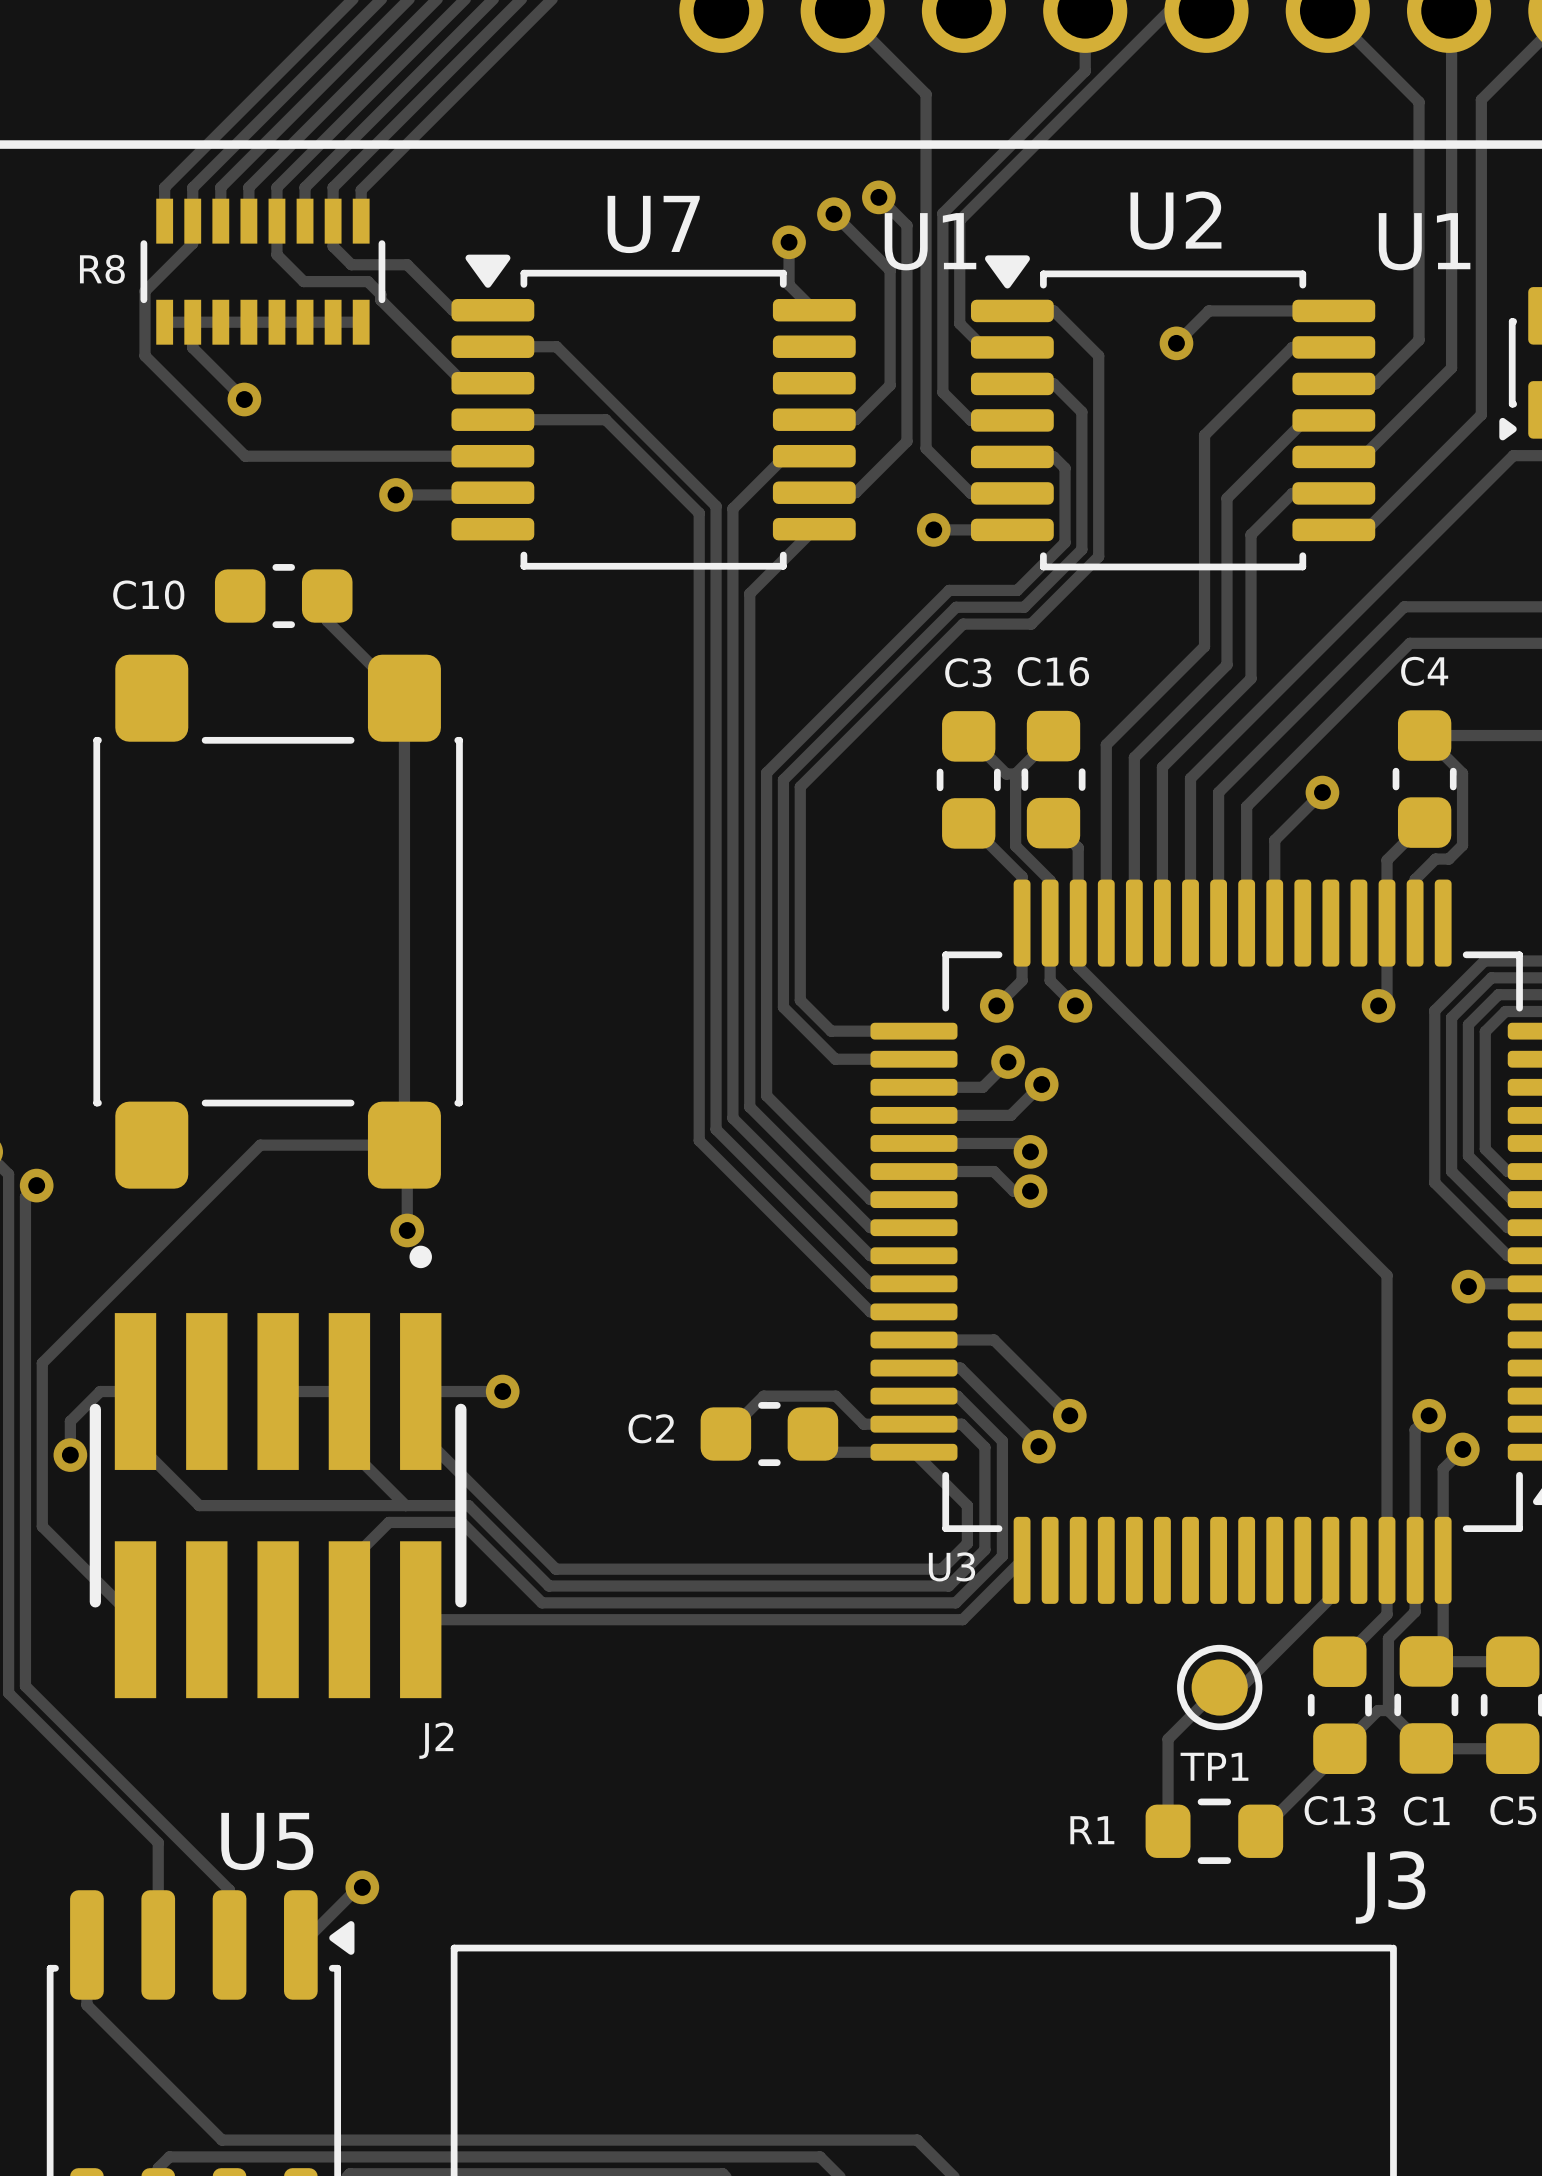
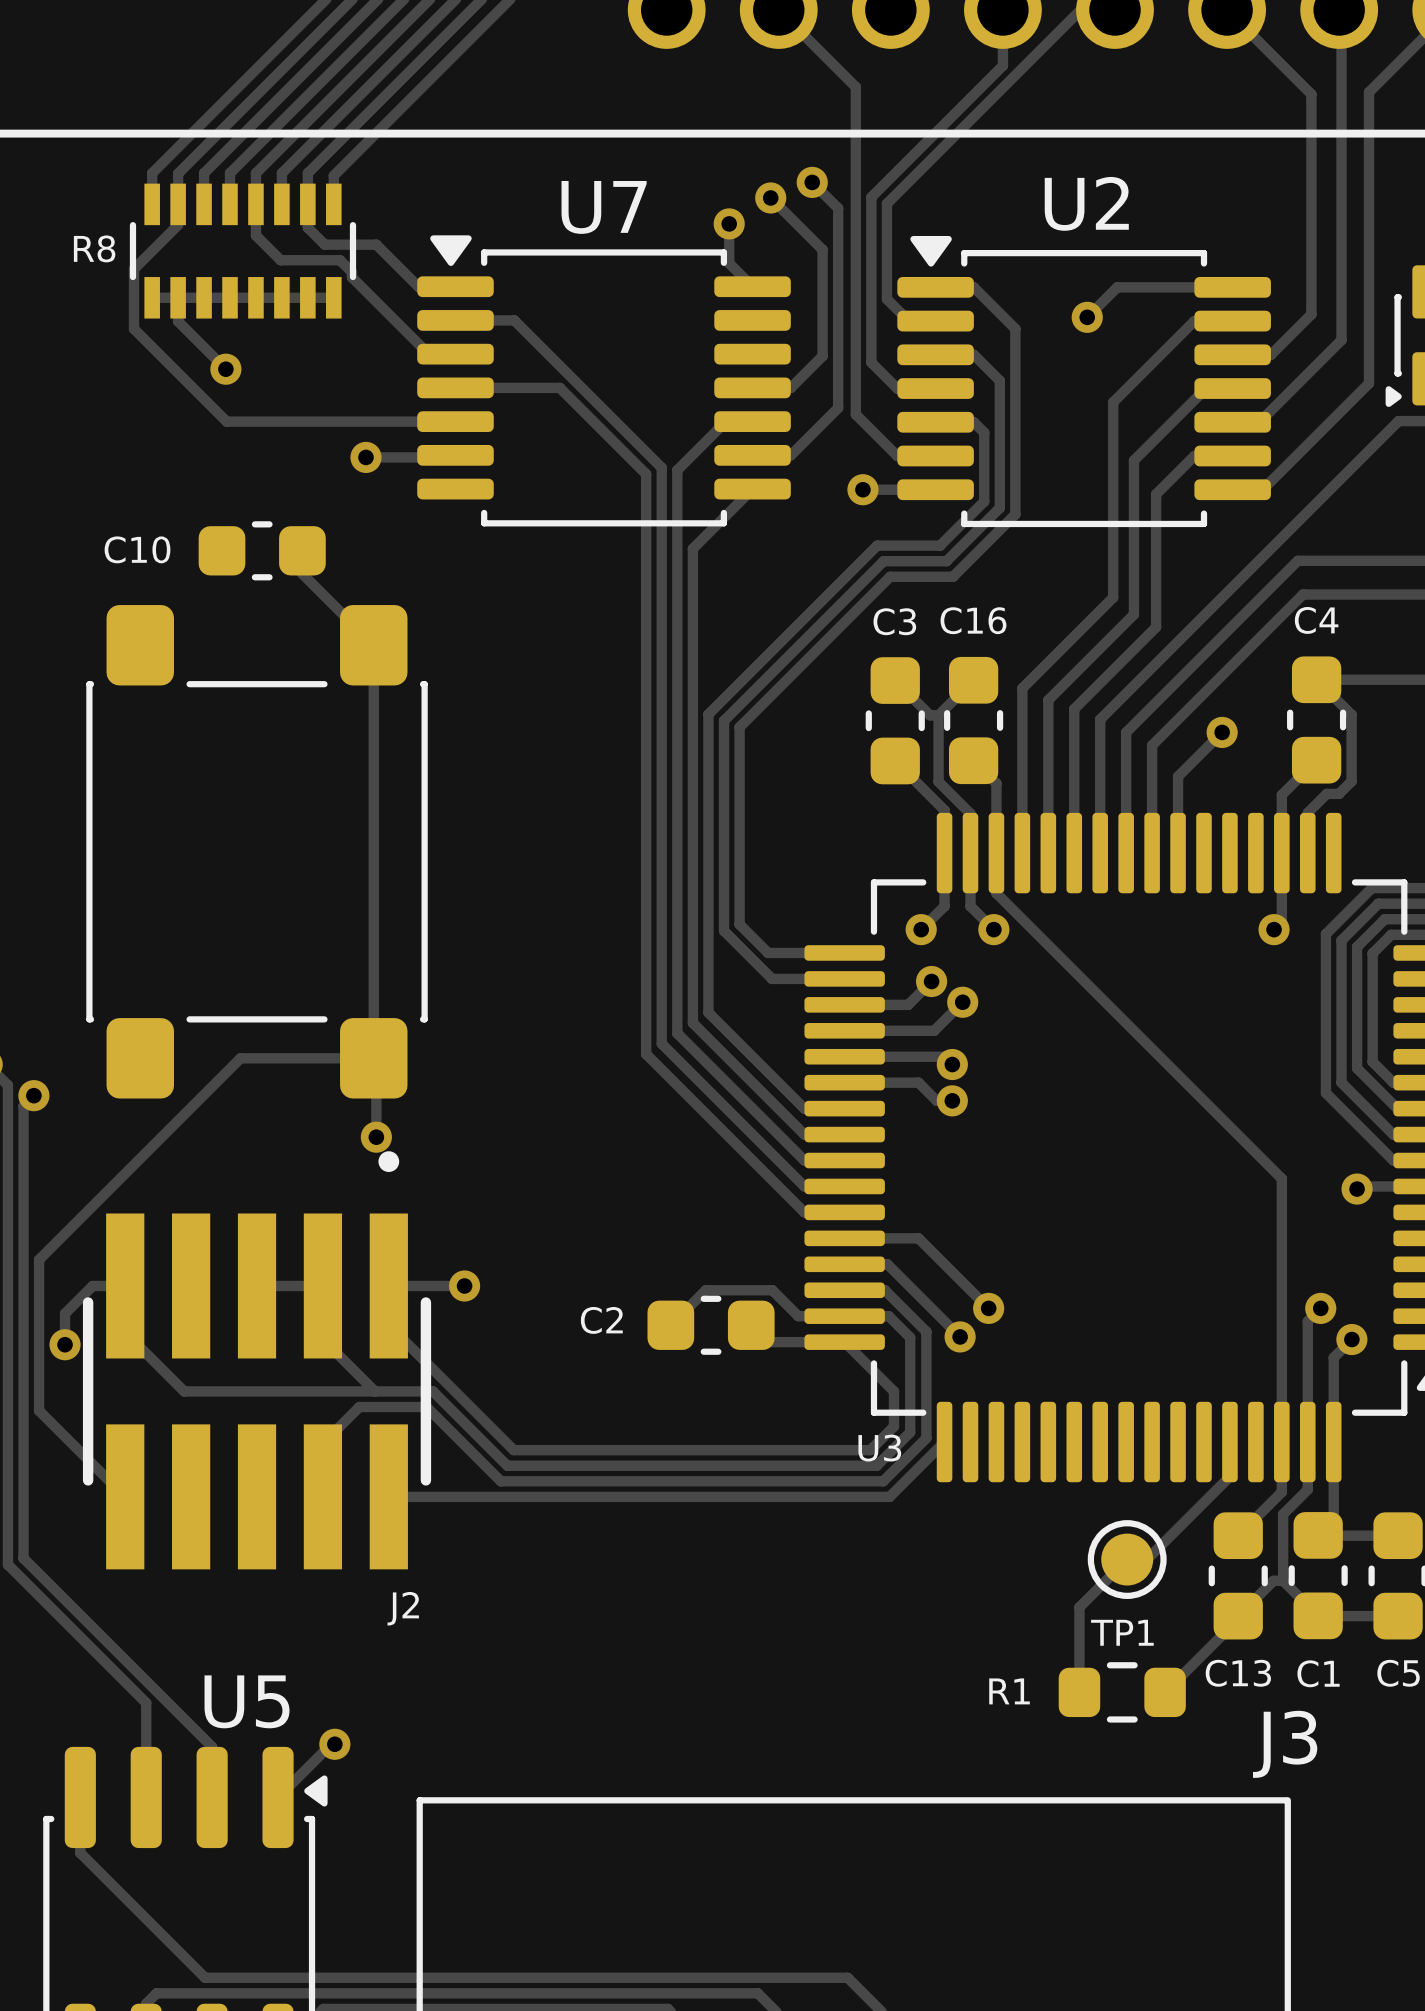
text: U1 (930, 241) -> none
text: U1 (1424, 241) -> none

